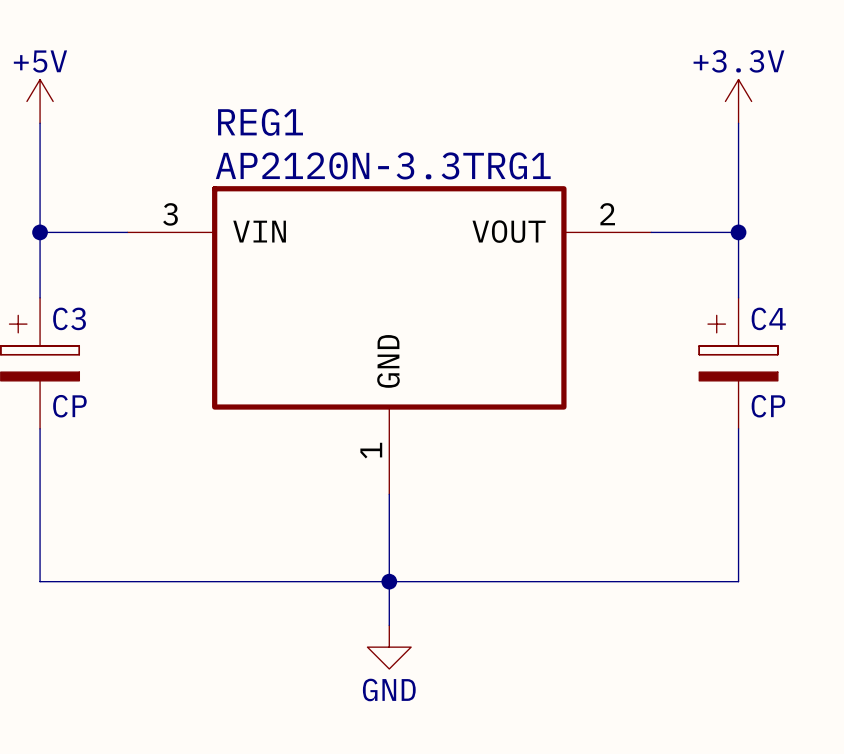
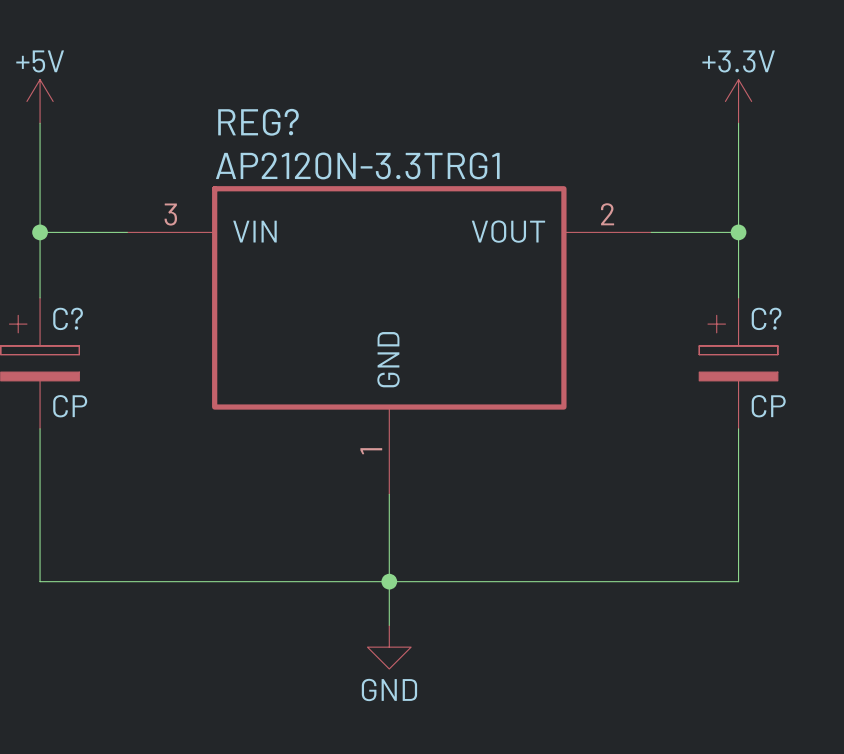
REG1 name: REG1 (260, 122) -> REG? (258, 122)
C3 name: C3 (69, 318) -> C? (68, 318)
C4 name: C4 (768, 318) -> C? (766, 318)

